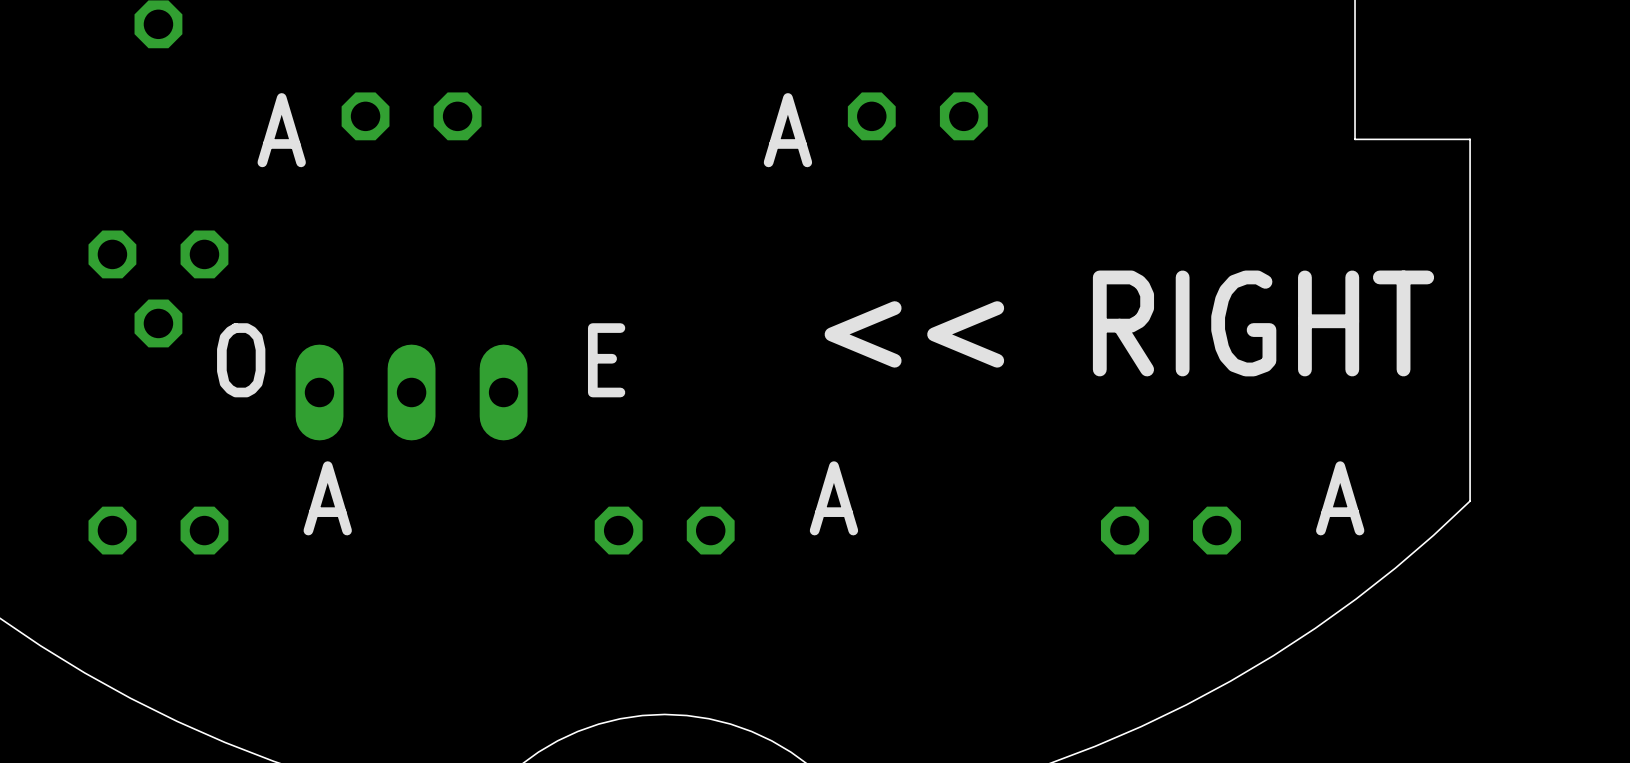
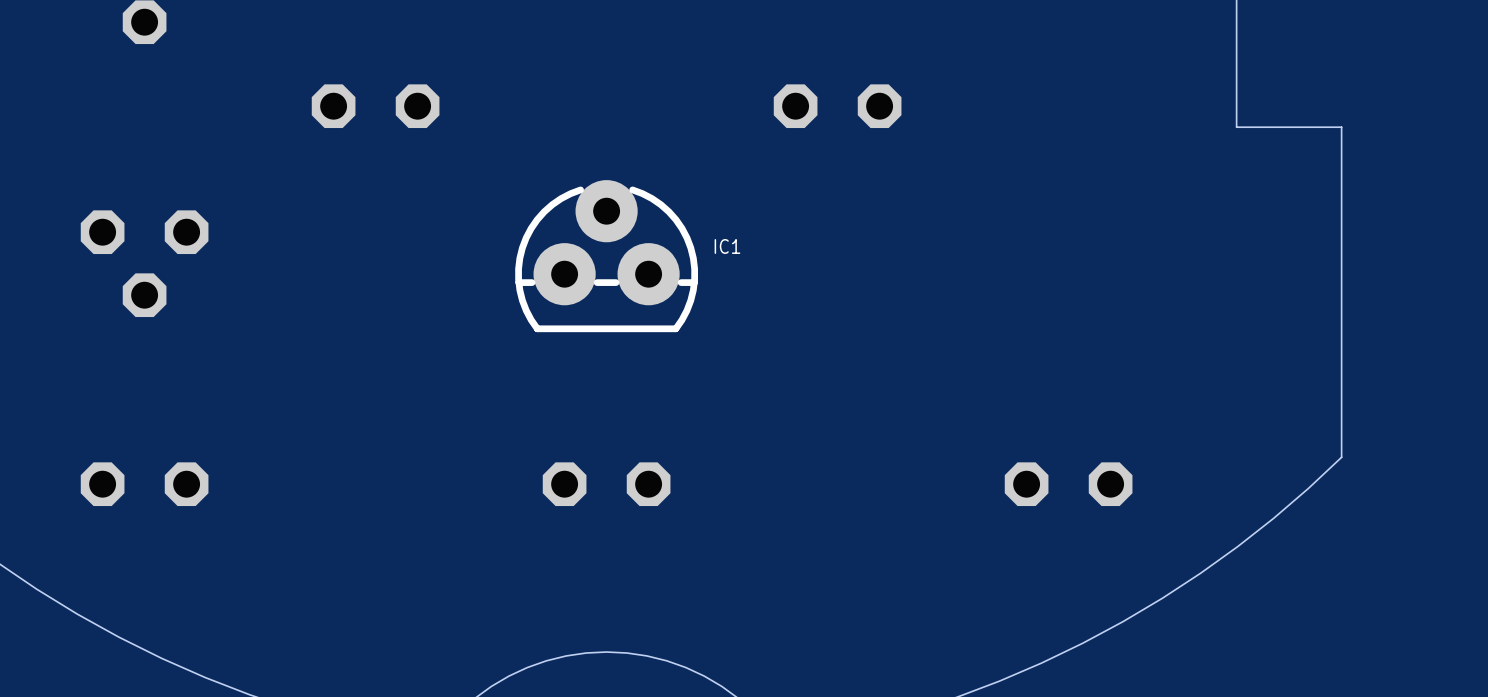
text: A (281, 130) -> none
text: A (787, 130) -> none
IC1: none -> (606, 256)
text: << RIGHT (1129, 323) -> none
text: O (241, 360) -> none
text: E (606, 360) -> none
part: (411, 392) -> none
text: A (327, 498) -> none
text: A (833, 498) -> none
text: A (1340, 498) -> none

